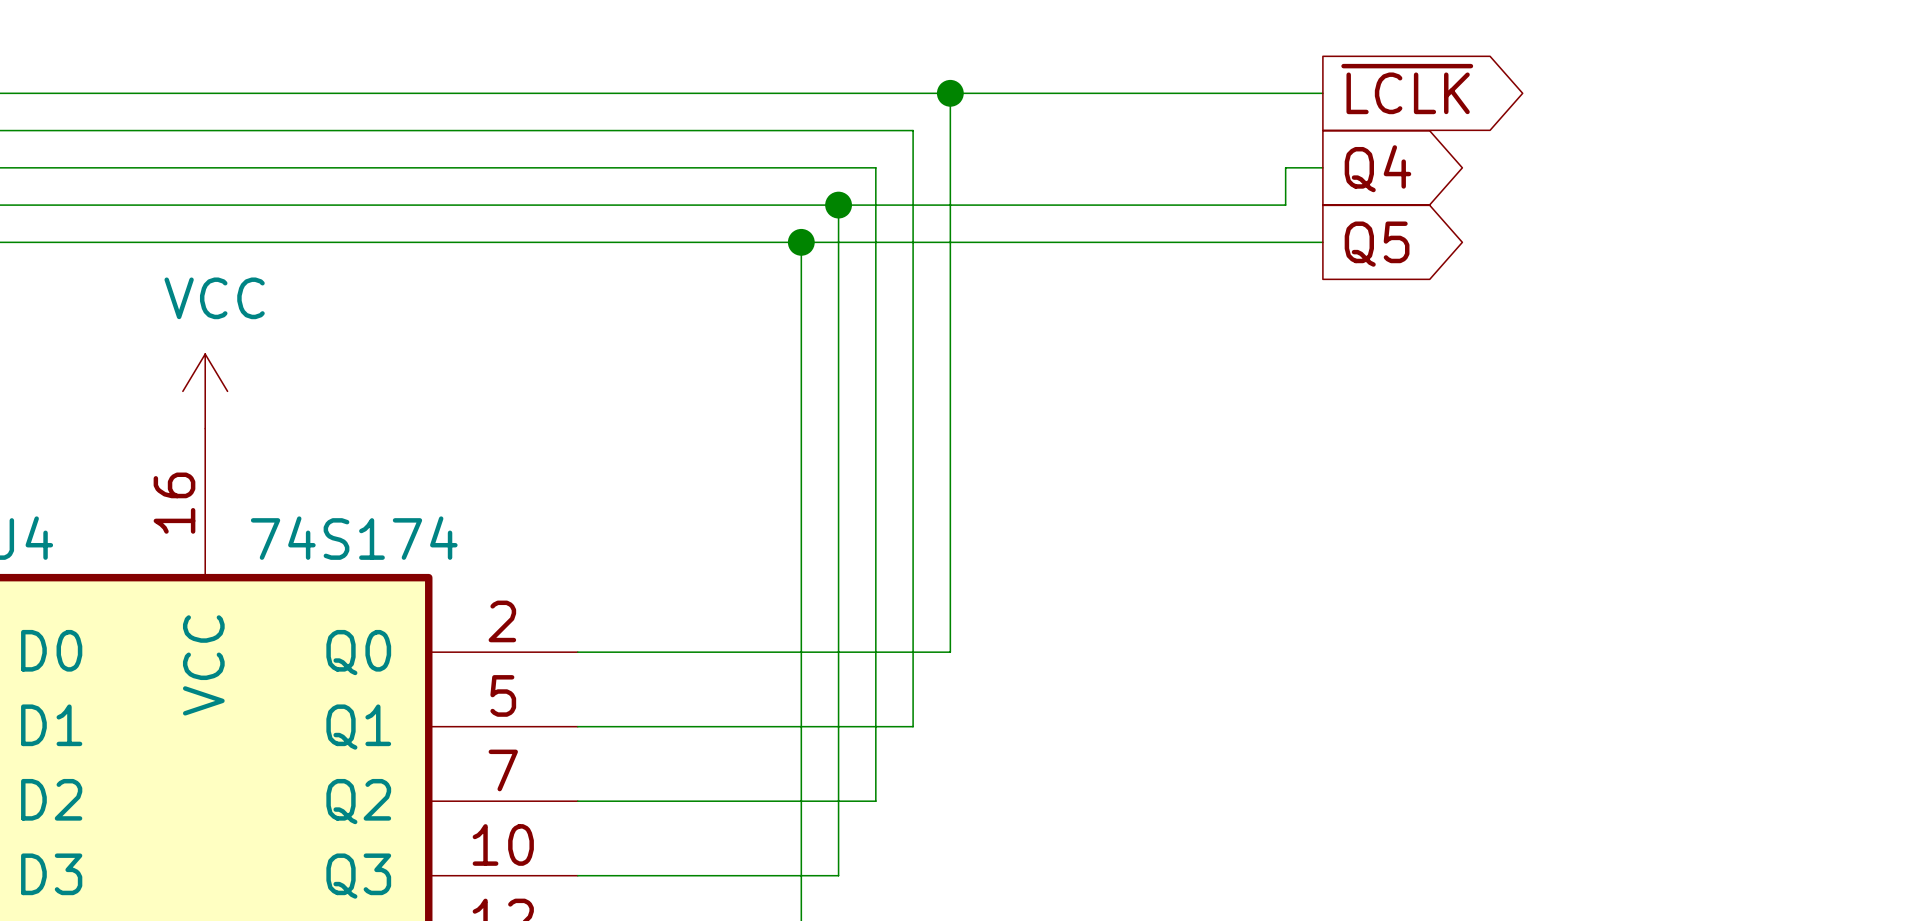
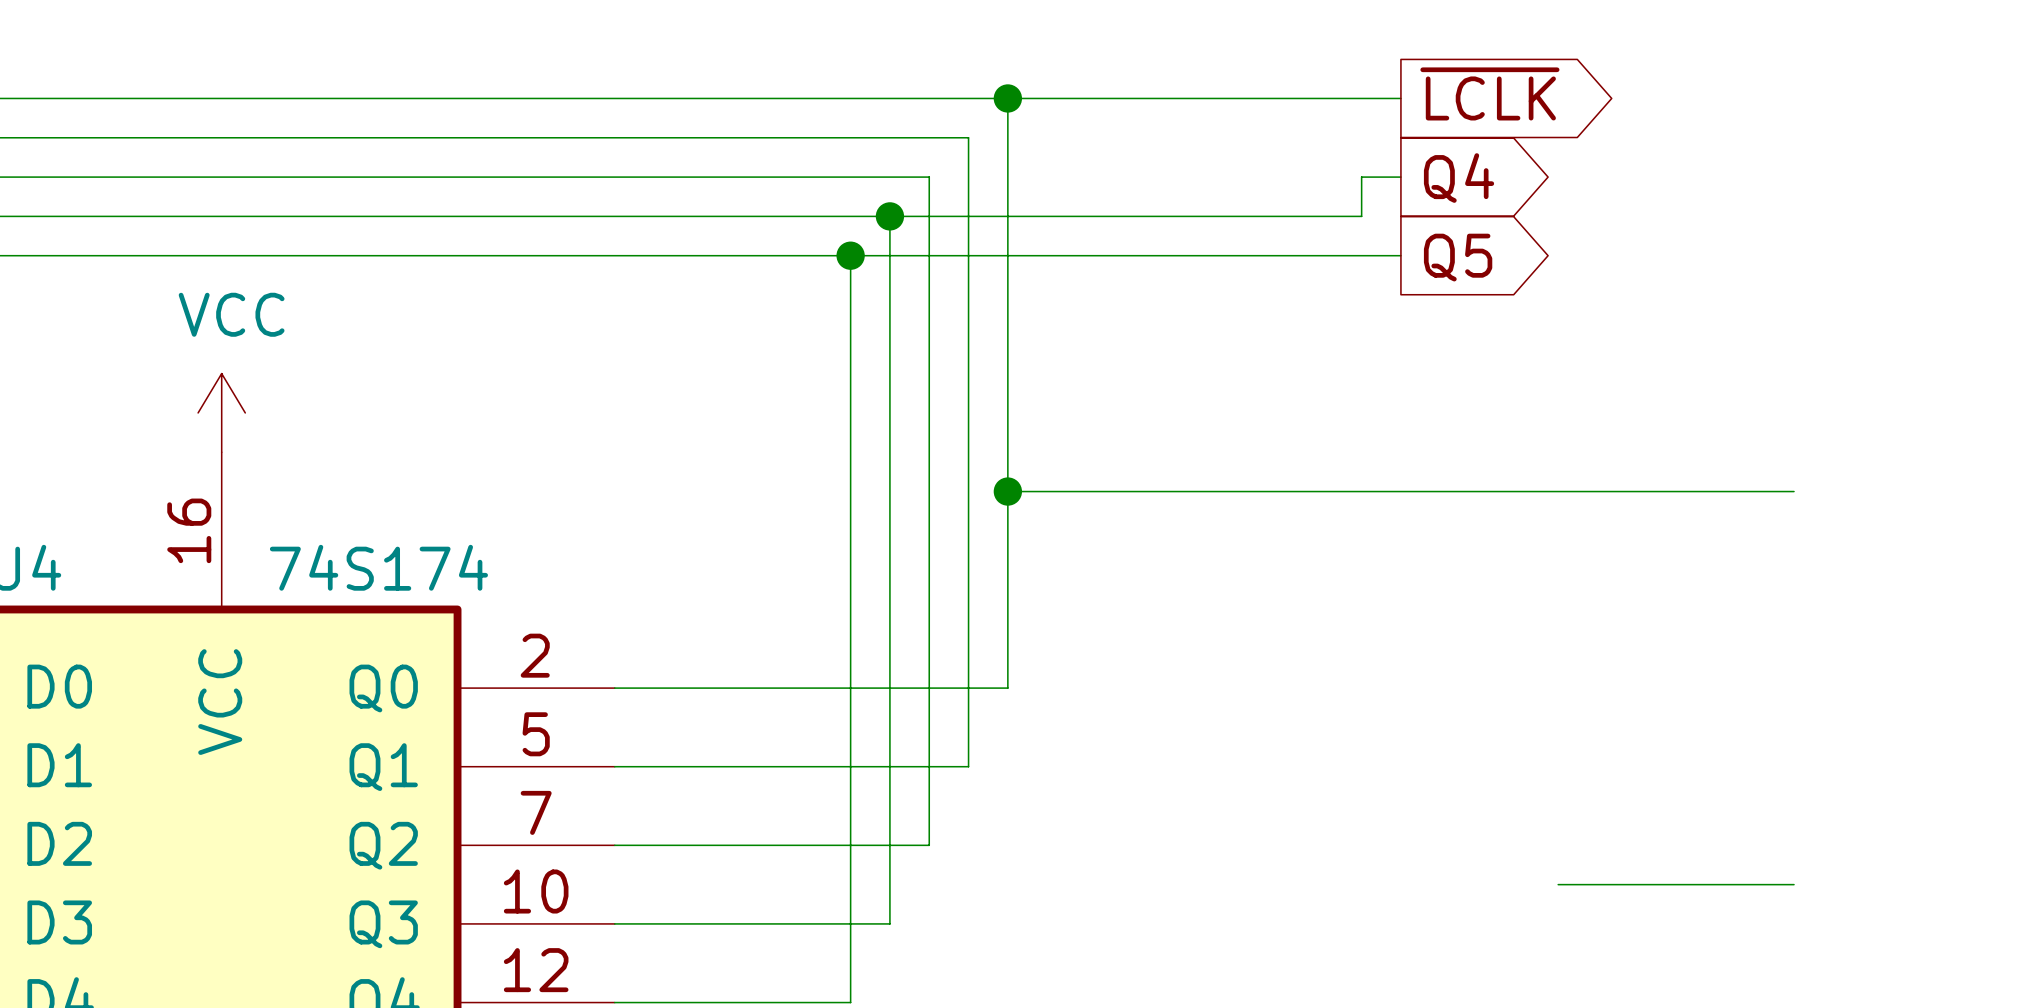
wire: none -> (1007, 491) (1794, 491)
junction: none -> (1007, 491)
wire: none -> (1558, 884) (1794, 884)

